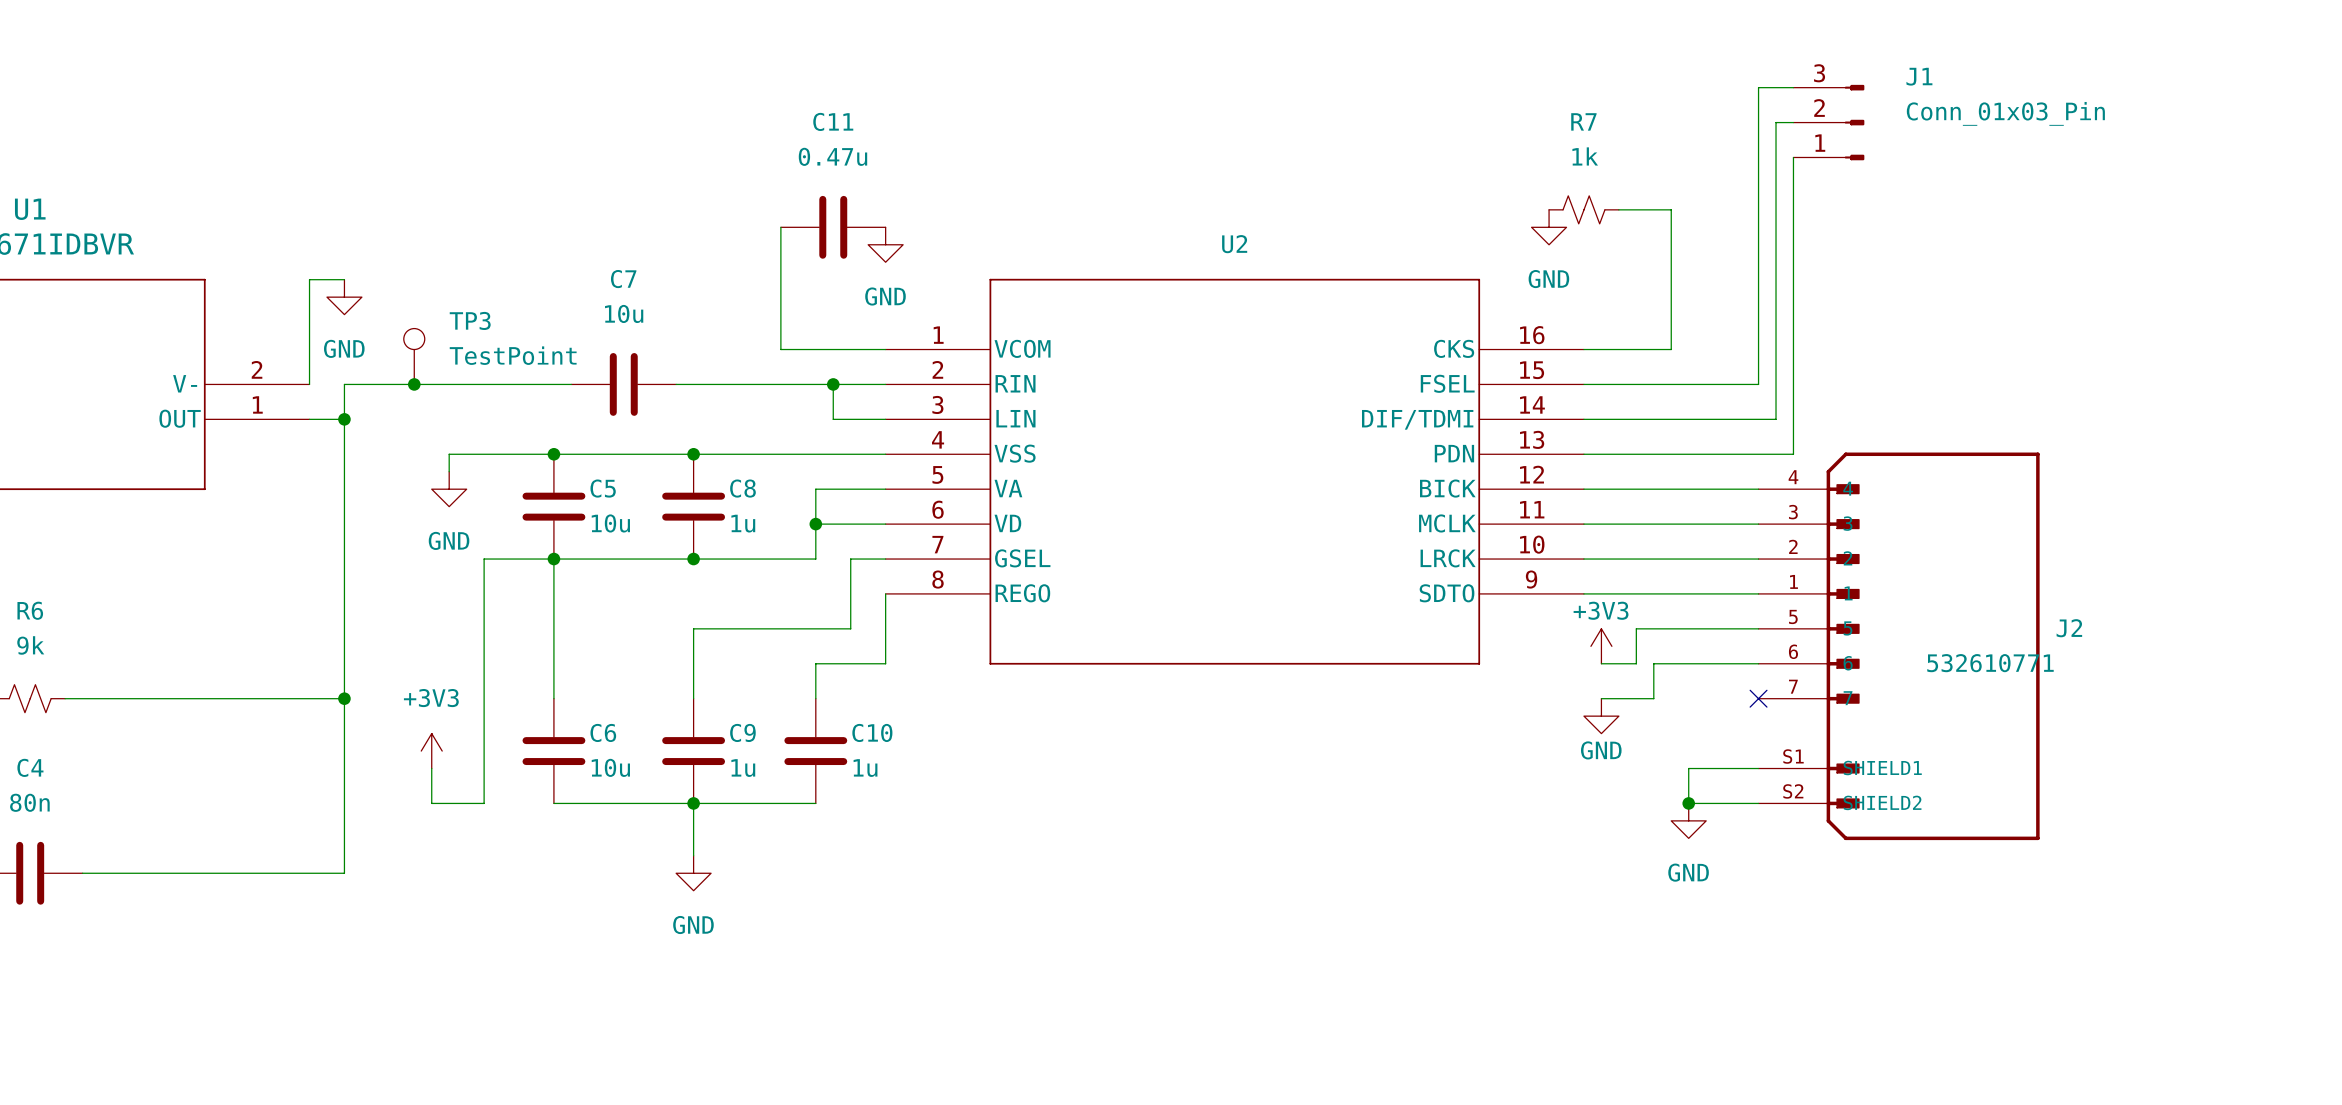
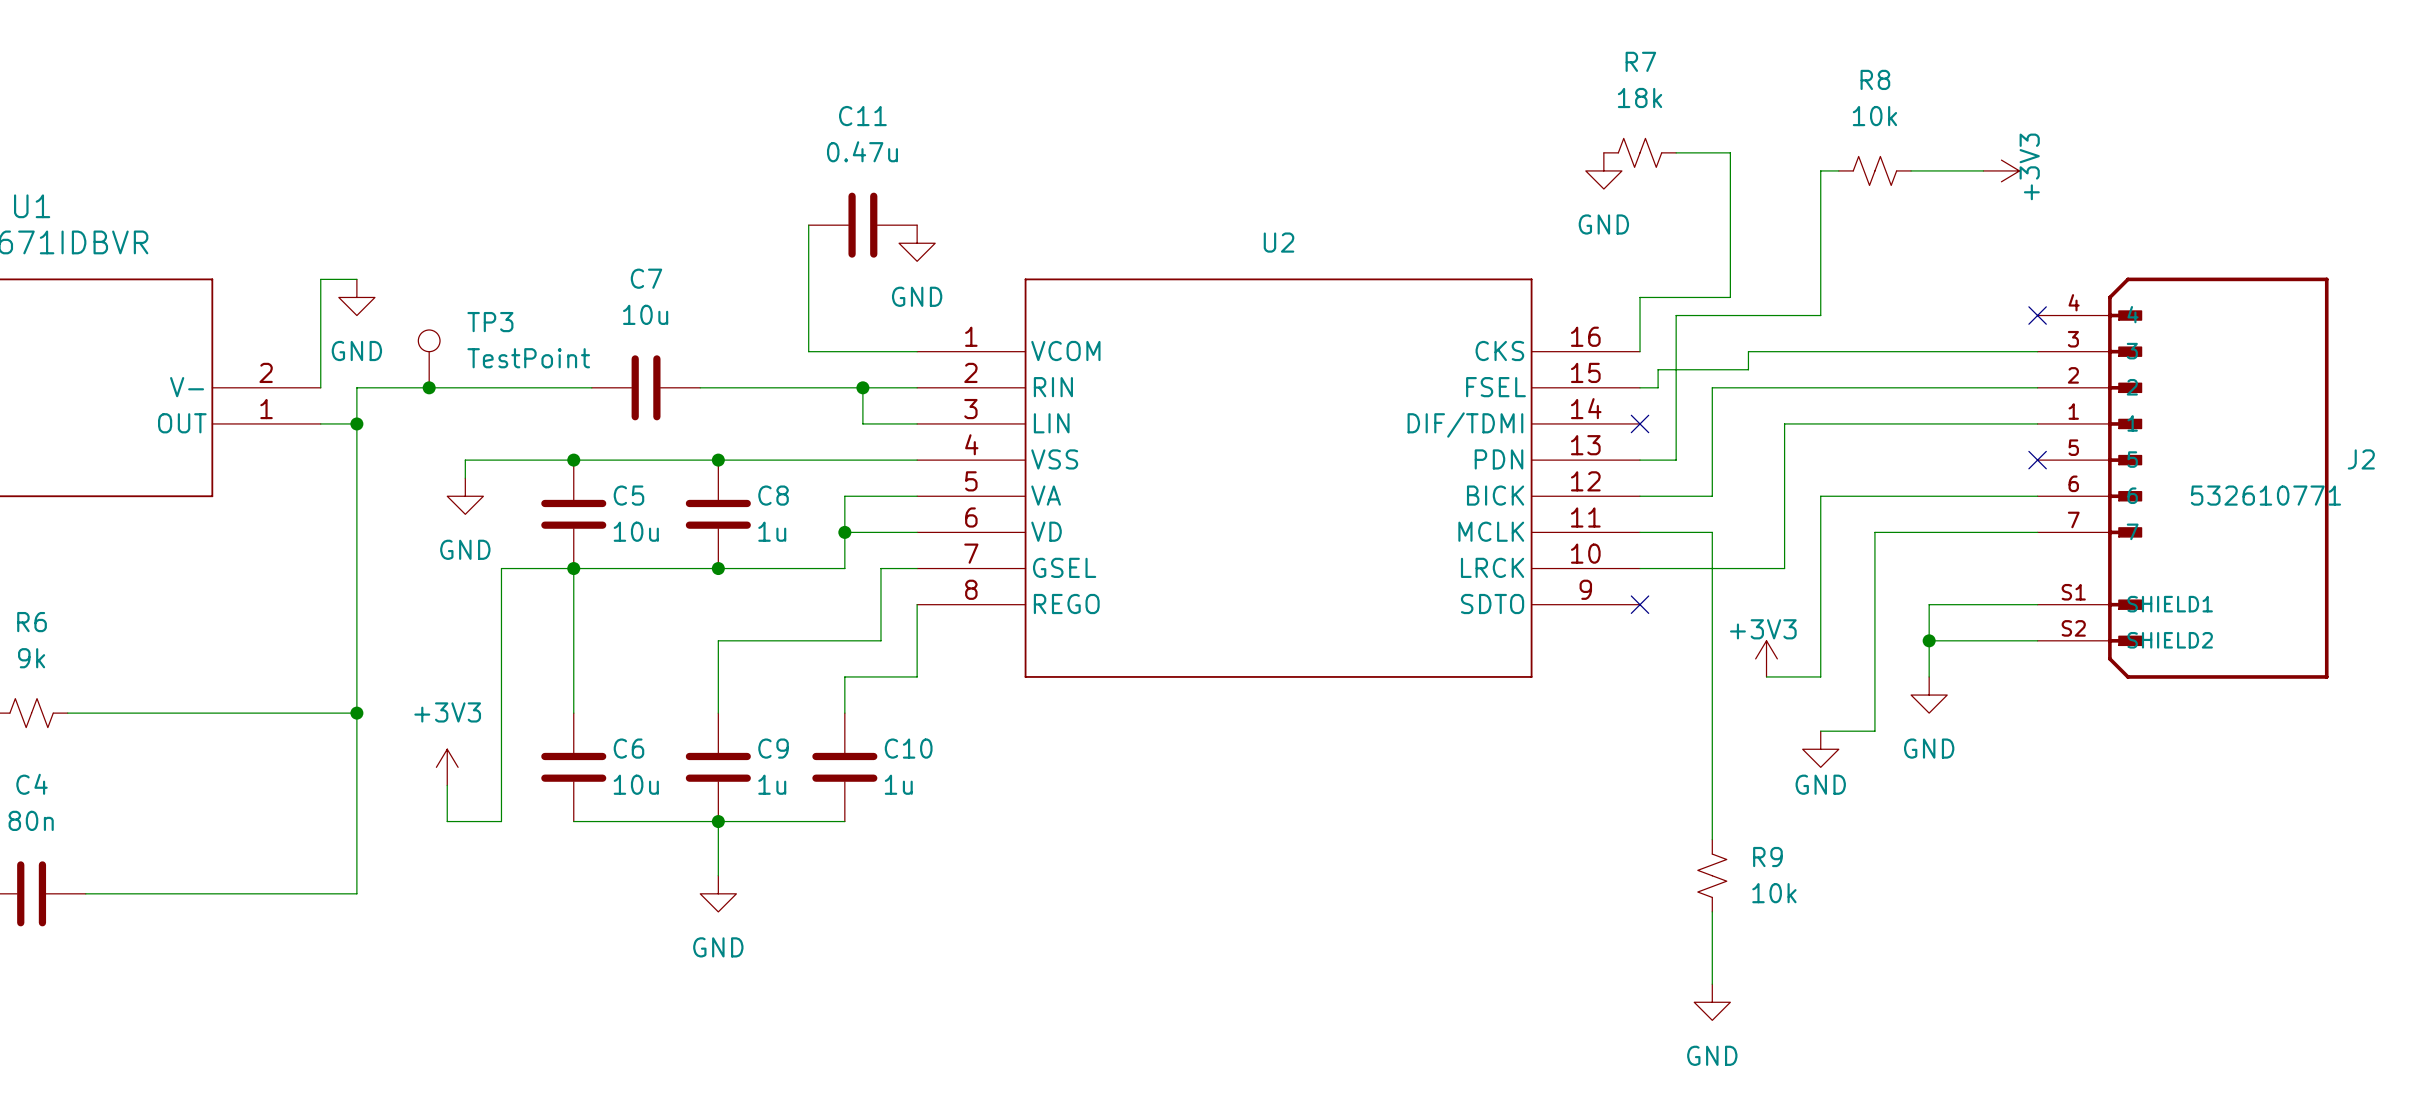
wire: (1793, 87) (1758, 87) (1758, 174) -> (1838, 170) (1820, 170)
wire: (1793, 122) (1776, 122) (1776, 419) -> (2037, 423) (1838, 423)
J1: Conn_01x03_Pin (1828, 122) -> none
R7 value: 1k (1585, 156) -> 18k (1640, 97)
wire: (1793, 157) (1793, 454) (1618, 454) -> none
R8: none -> 10k (1874, 170)
wire: none -> (1911, 170) (1983, 170)
power symbol: none -> +3V3 (2001, 170)
R7 position: (1583, 209) -> (1640, 152)
wire: (1618, 209) (1671, 209) -> (1676, 152) (1730, 152) (1730, 207)
power symbol position: GND (1549, 227) -> GND (1603, 170)
wire: (1671, 297) (1671, 349) (1583, 349) -> (1730, 297) (1640, 297) (1640, 351)
wire: (1758, 314) (1758, 384) -> (1820, 315) (1676, 315) (1676, 460)
no-connect mark: none -> (2037, 315)
wire: none -> (2037, 351) (1748, 351) (1748, 369) (1658, 369) (1658, 387)
wire: (1601, 384) (1653, 384) -> (1712, 496) (1712, 387)
wire: none -> (1820, 387) (2037, 387)
wire: (1583, 419) (1723, 419) -> none
no-connect mark: none -> (1640, 423)
no-connect mark: none -> (2037, 460)
wire: (1653, 489) (1758, 489) -> none
wire: none -> (2037, 496) (1820, 496) (1820, 676)
wire: (1653, 524) (1758, 524) -> (1929, 640) (2037, 640)
wire: none -> (2037, 532) (1874, 532) (1874, 731) (1820, 731)
wire: (1723, 559) (1758, 559) -> (1784, 568) (1784, 423)
wire: (1583, 593) (1758, 593) -> none
no-connect mark: none -> (1640, 604)
wire: none -> (2037, 604) (1929, 604) (1929, 676)
power symbol text position: +3V3 (1601, 610) -> +3V3 (1763, 629)
wire: (1758, 628) (1636, 628) (1636, 663) (1601, 663) -> none
junction: none -> (1929, 640)
power symbol position: +3V3 (1601, 646) -> +3V3 (1766, 658)
J2 position: (1899, 646) -> (2183, 478)
wire: (1653, 663) (1706, 663) -> (1712, 676) (1712, 532)
power symbol: none -> GND (1929, 695)
wire: (1601, 698) (1653, 698) -> (1712, 839) (1712, 713)
no-connect mark: (1758, 698) -> none
power symbol: GND (1601, 716) -> none
power symbol: none -> GND (1820, 749)
wire: (1758, 768) (1688, 768) (1688, 803) (1758, 803) -> none
junction: (1688, 803) -> none
power symbol: GND (1688, 820) -> none
R9: none -> 10k (1712, 875)
wire: none -> (1712, 911) (1712, 984)
power symbol: none -> GND (1712, 1002)

